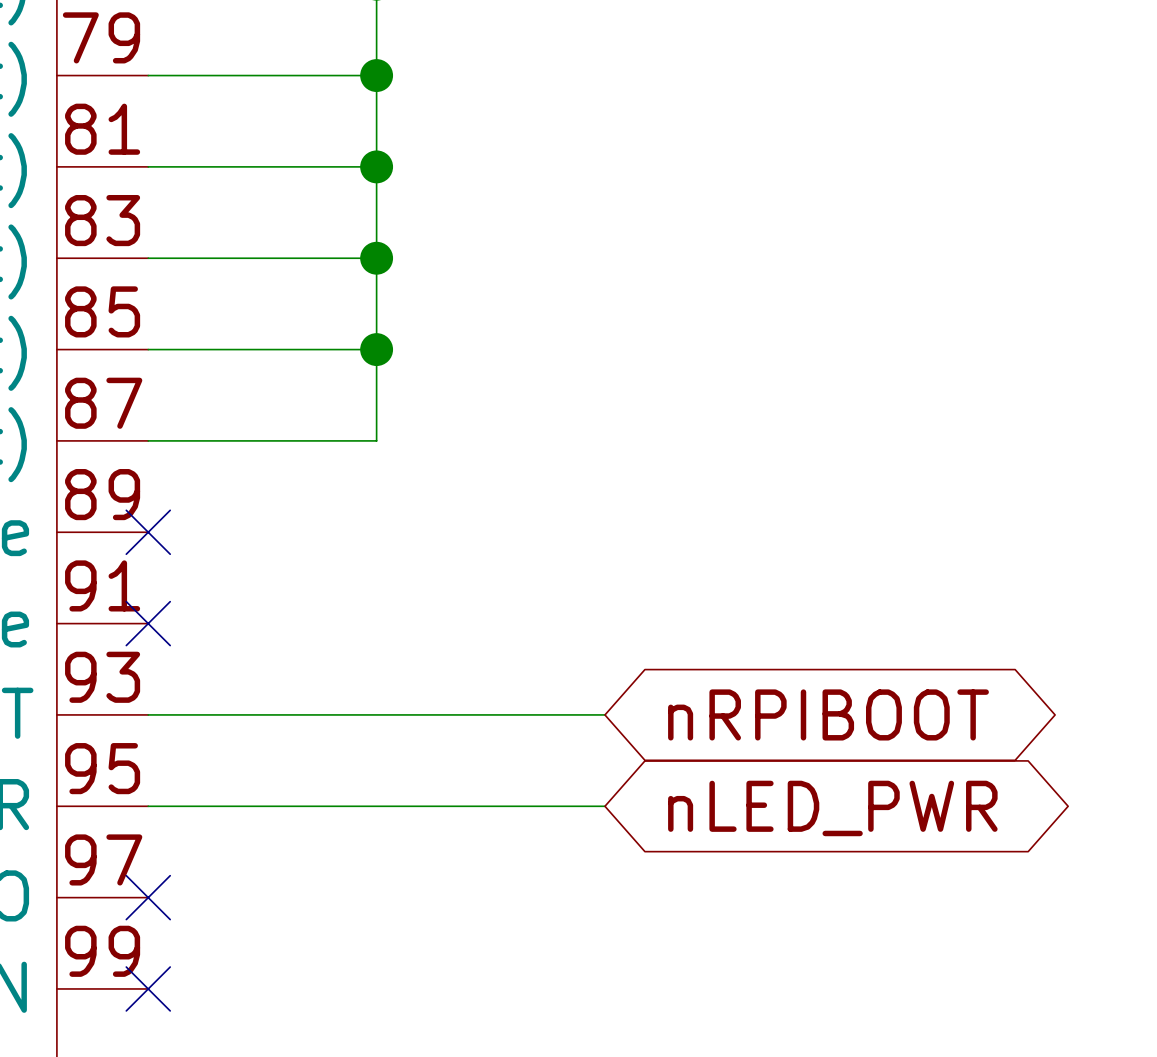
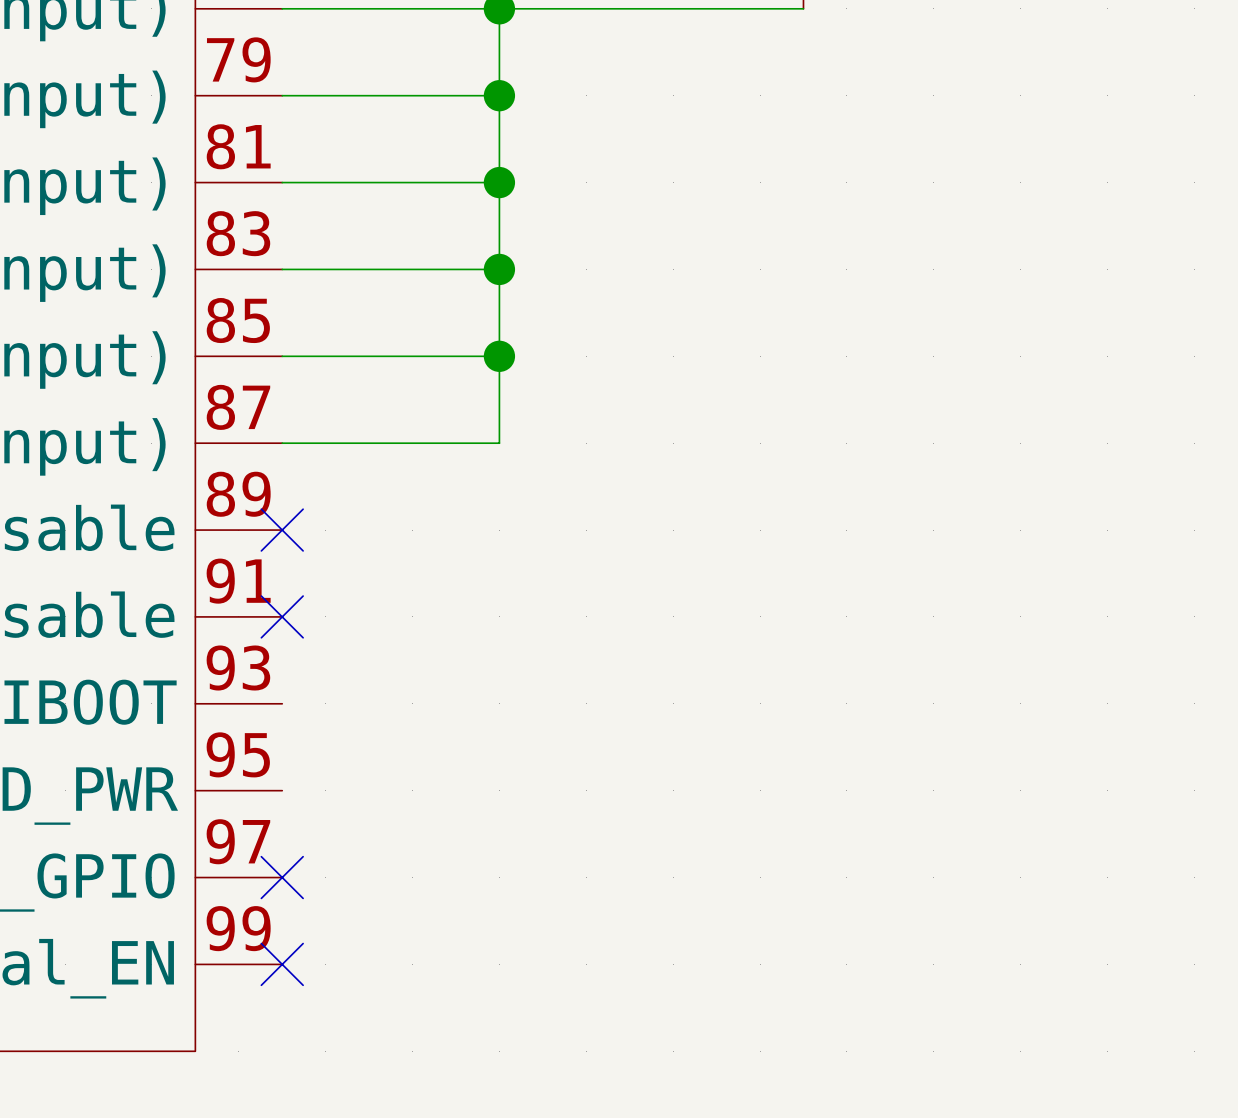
wire: (148, 714) (604, 714) -> none
global label: nRPIBOOT (828, 714) -> none
wire: (148, 806) (604, 806) -> none
global label: nLED_PWR (832, 808) -> none

